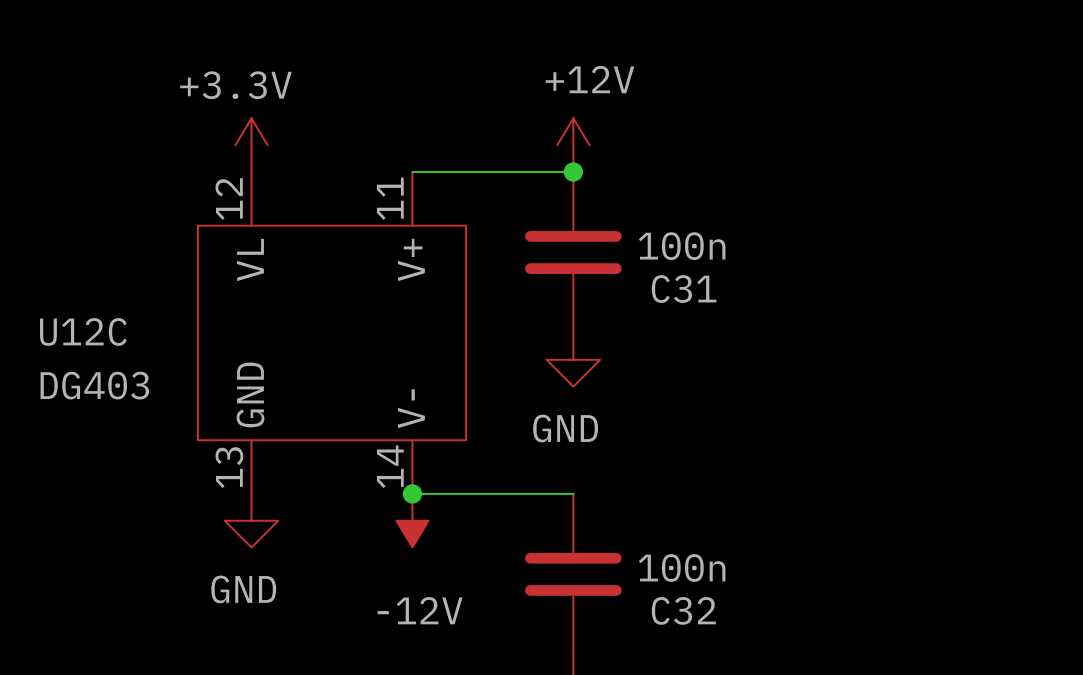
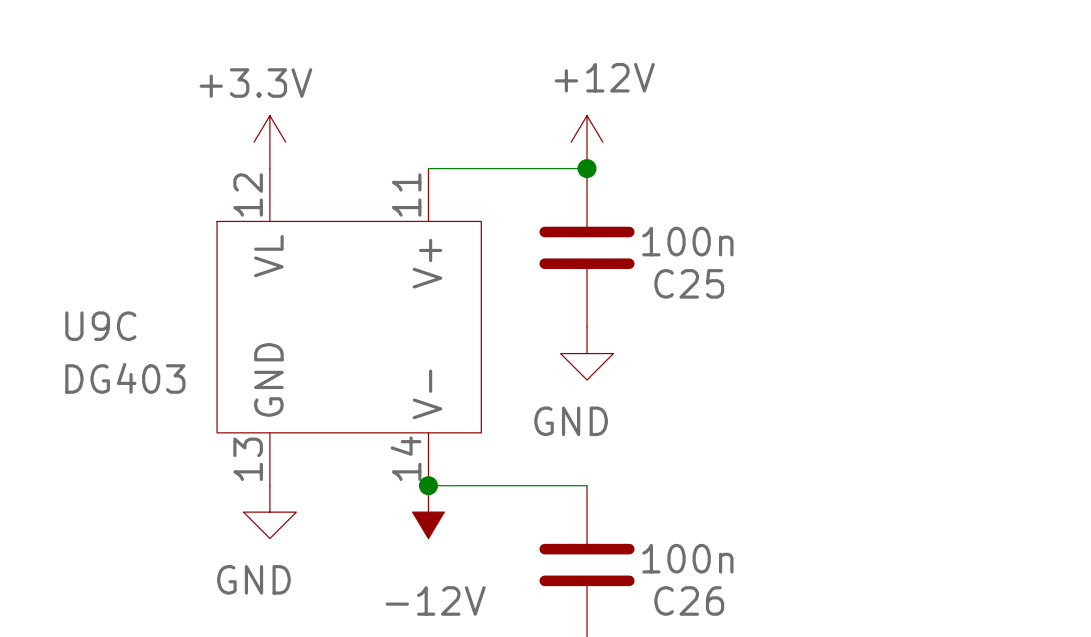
C31 name: C31 (684, 289) -> C25 (689, 283)
U12C name: U12C (83, 331) -> U9C (100, 326)
C32 name: C32 (683, 610) -> C26 (689, 600)

